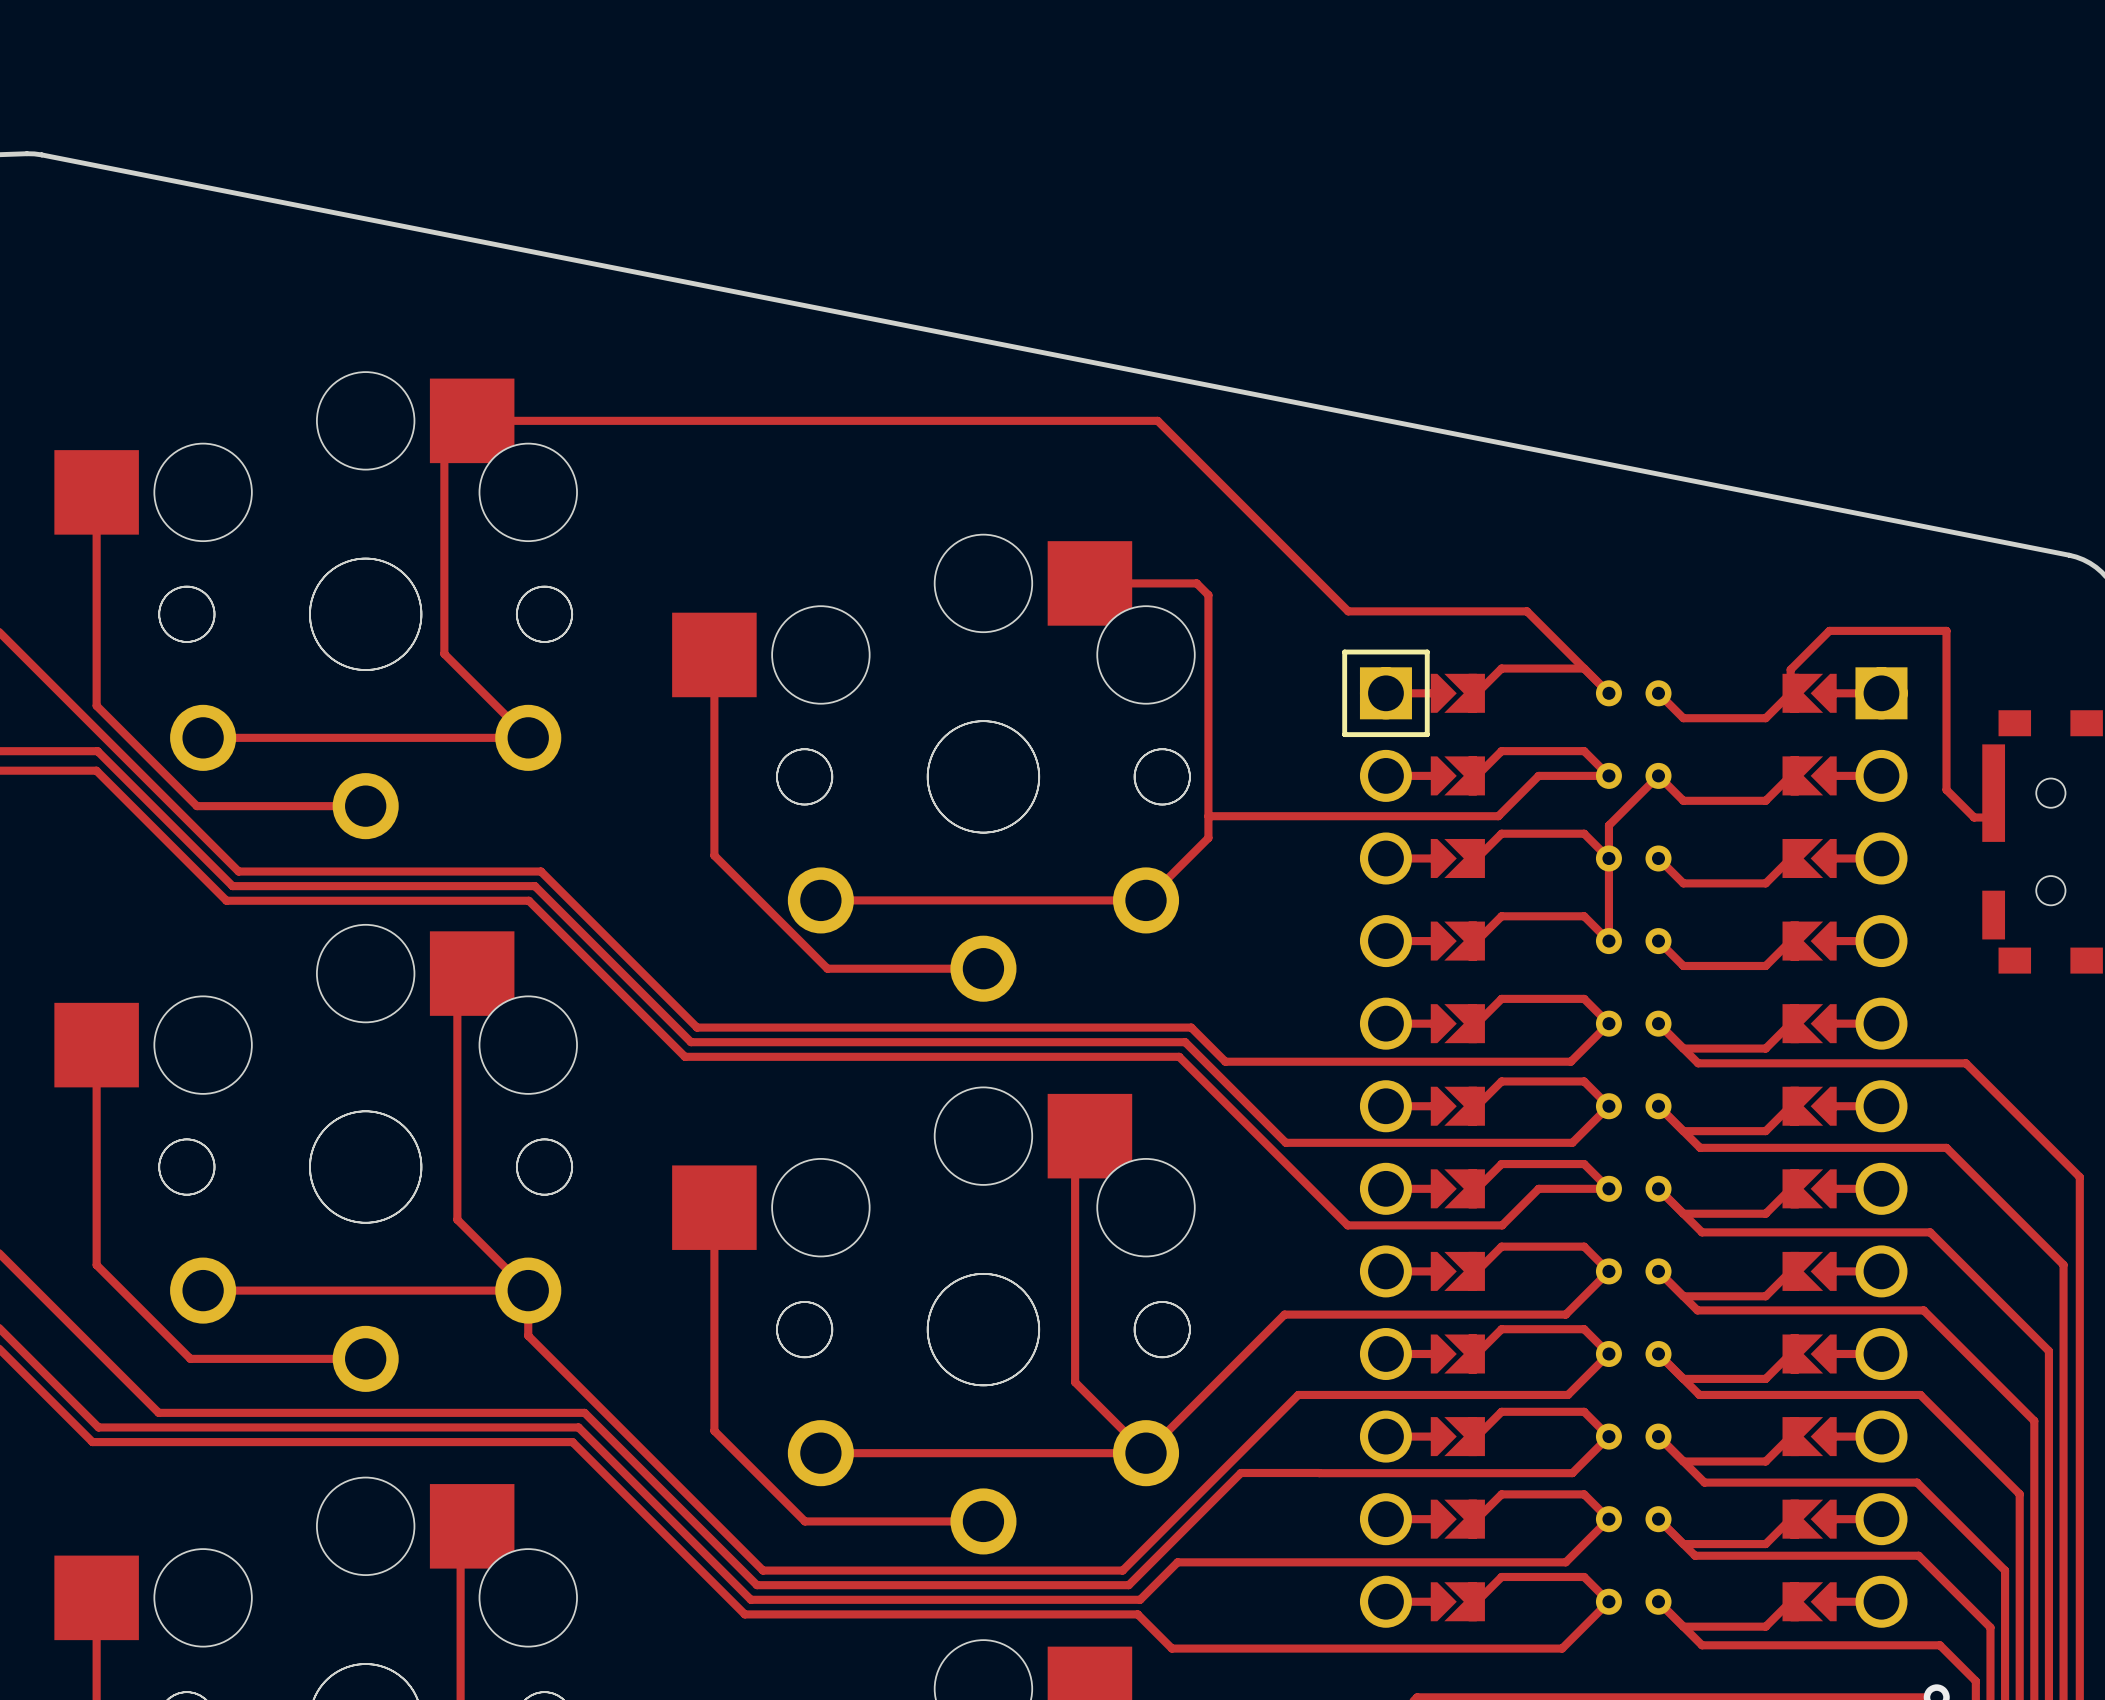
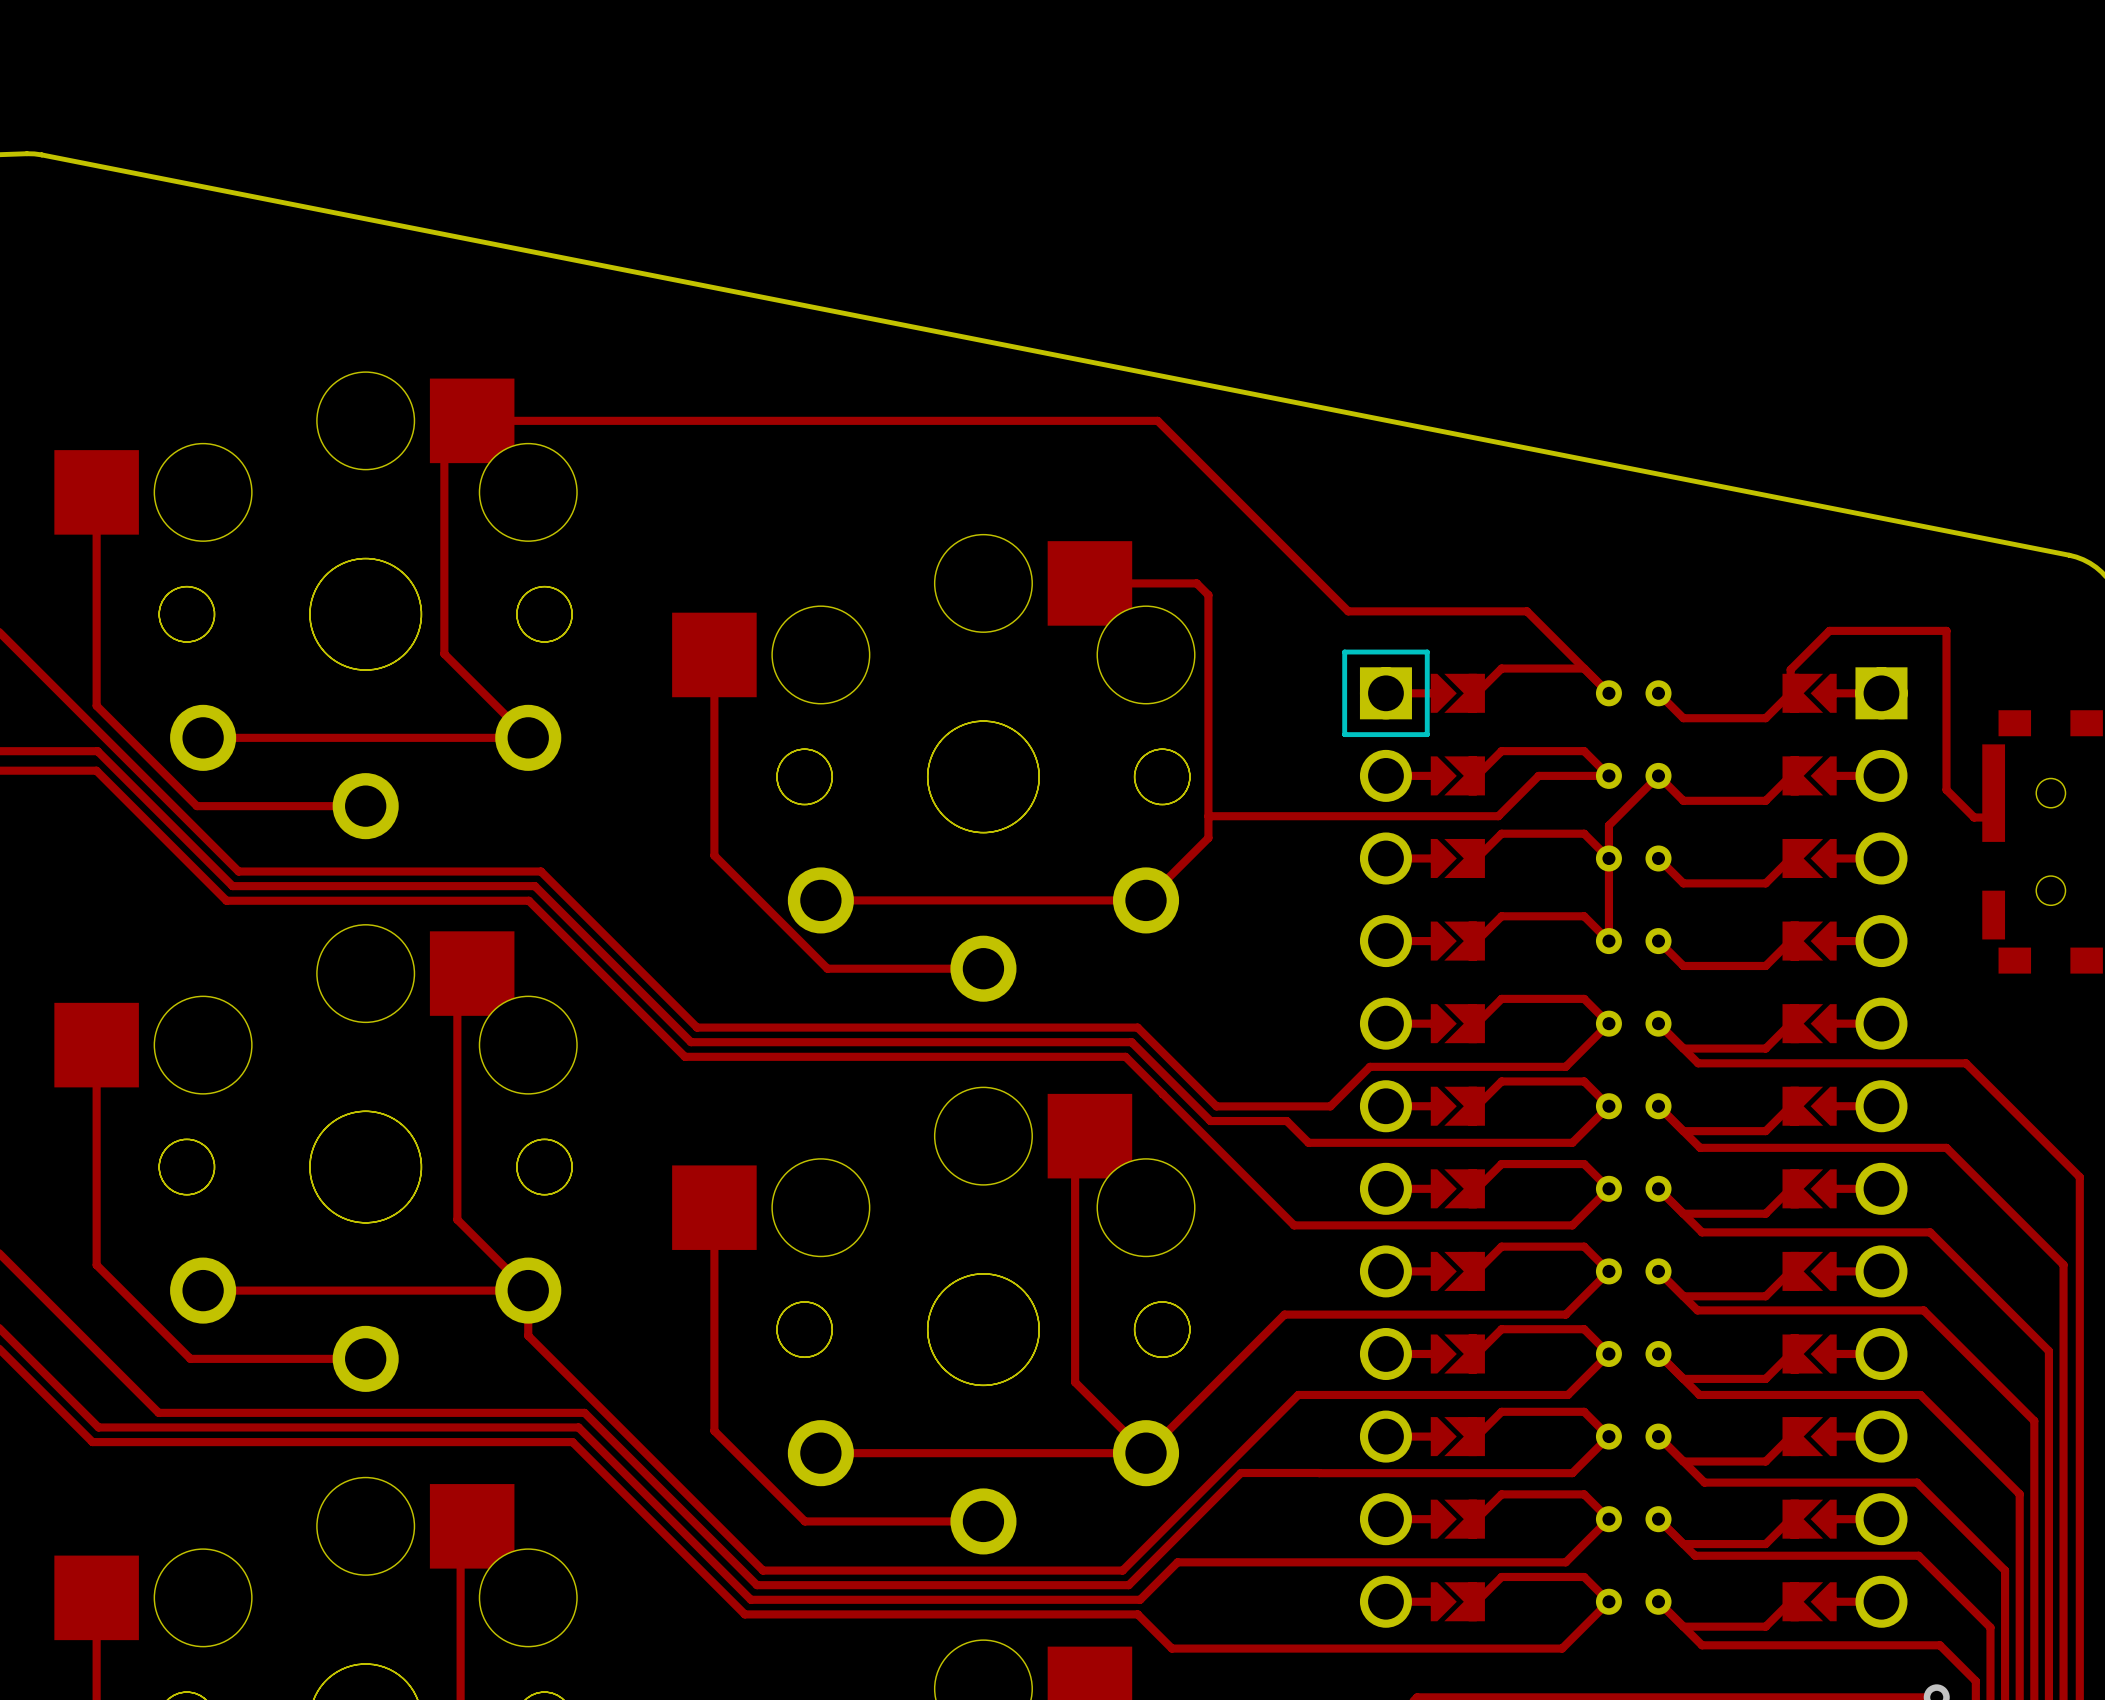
track: (1137, 1027) (1191, 1027) (1225, 1061) (1570, 1061) -> (1137, 1027) (1216, 1106) (1330, 1106) (1369, 1066) (1565, 1066) (1570, 1061)
track: (1131, 1042) (1185, 1042) (1285, 1142) (1308, 1142) -> (1131, 1042) (1210, 1121) (1286, 1121) (1308, 1142)
track: (1125, 1056) (1179, 1056) (1347, 1225) -> (1125, 1056) (1294, 1225) (1347, 1225)
track: (1608, 1188) (1538, 1188) (1502, 1225) -> (1608, 1188) (1572, 1225) (1502, 1225)

